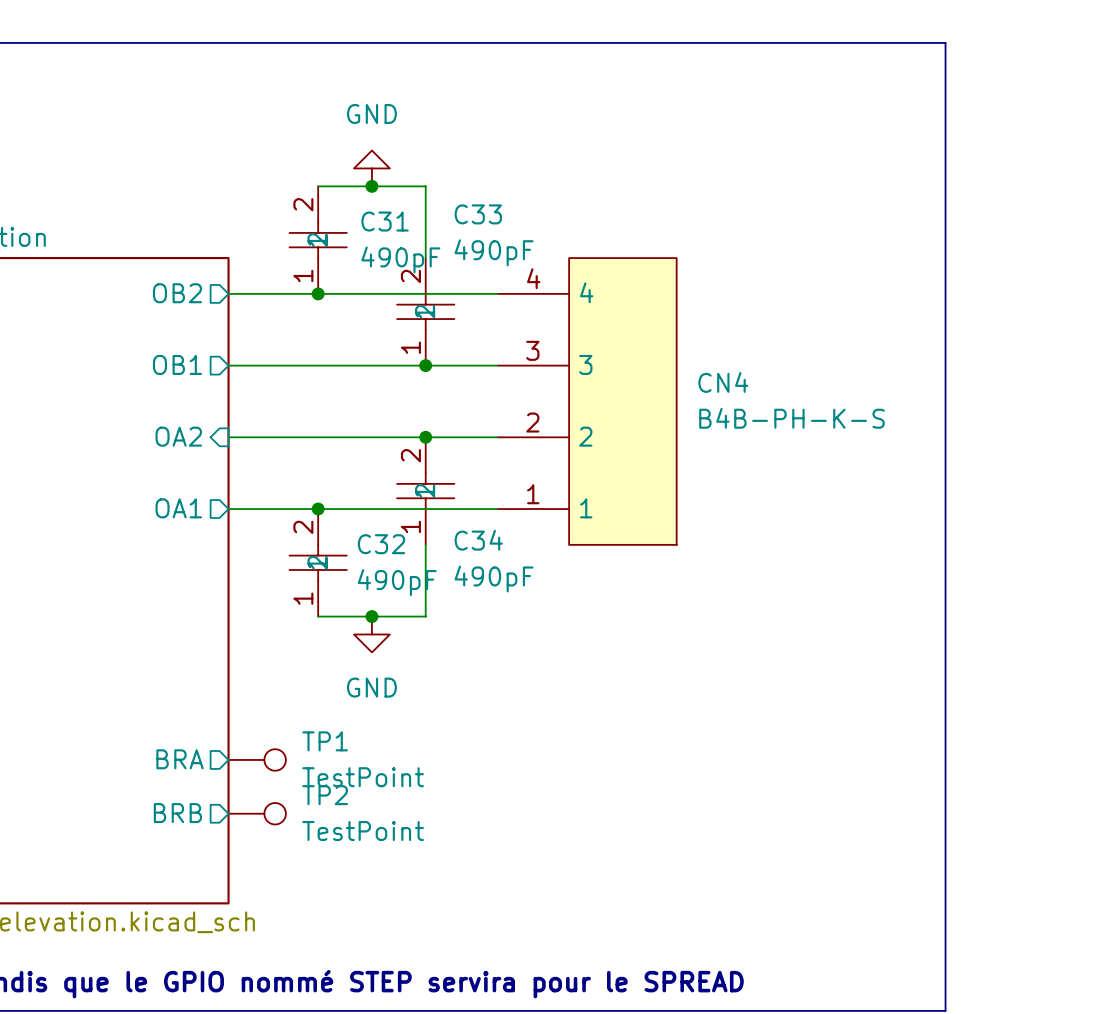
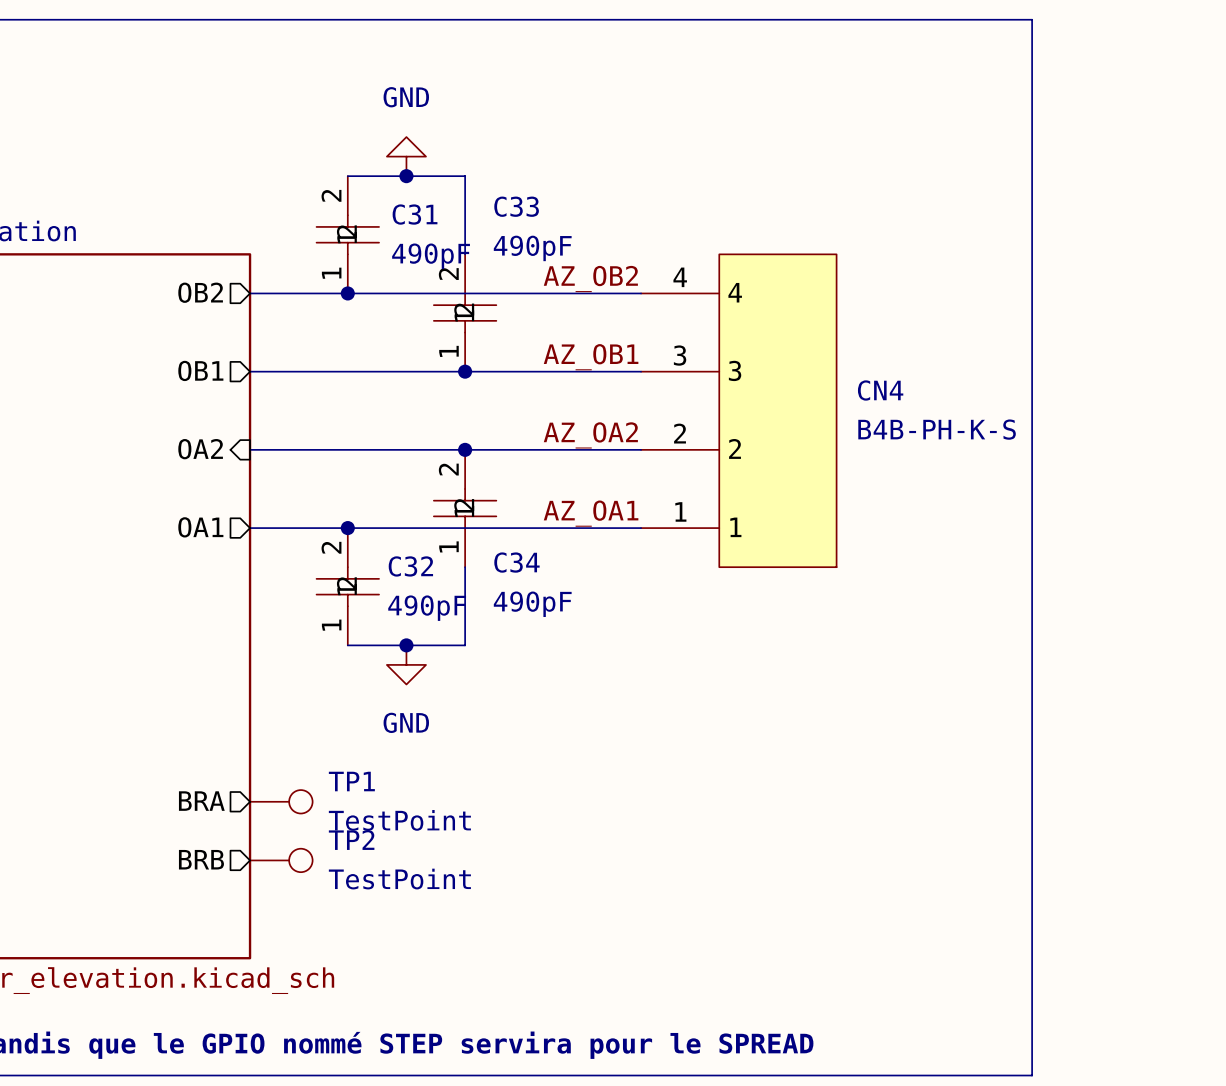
label: none -> AZ_OB2 (590, 279)
label: none -> AZ_OB1 (591, 357)
CN4 position: (587, 401) -> (738, 410)
label: none -> AZ_OA2 (590, 435)
label: none -> AZ_OA1 (591, 513)

